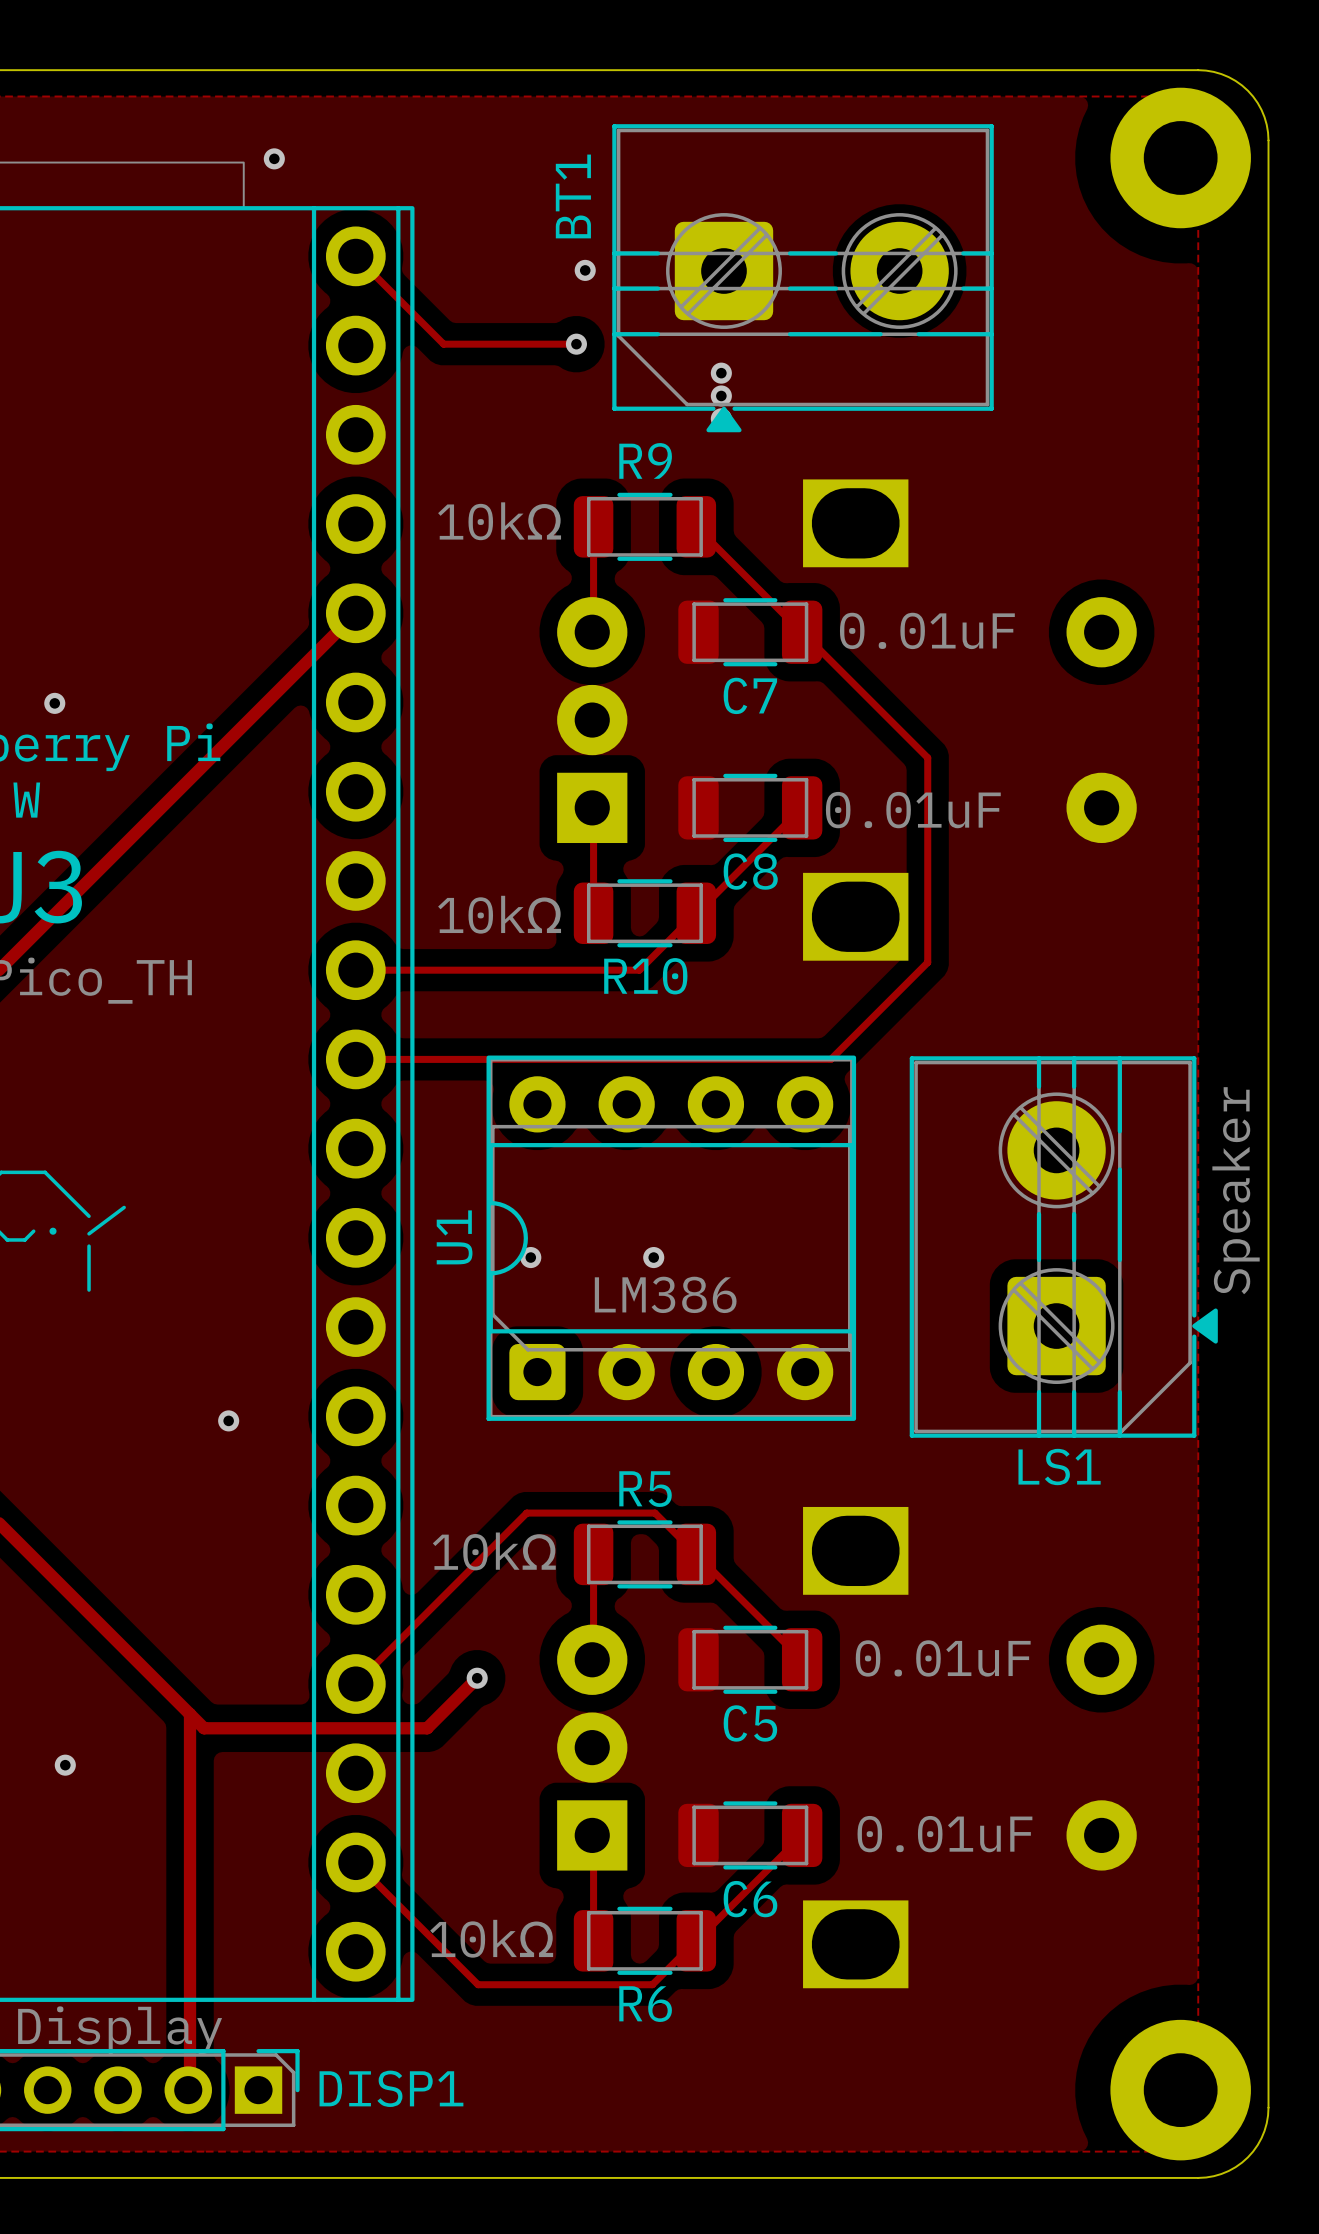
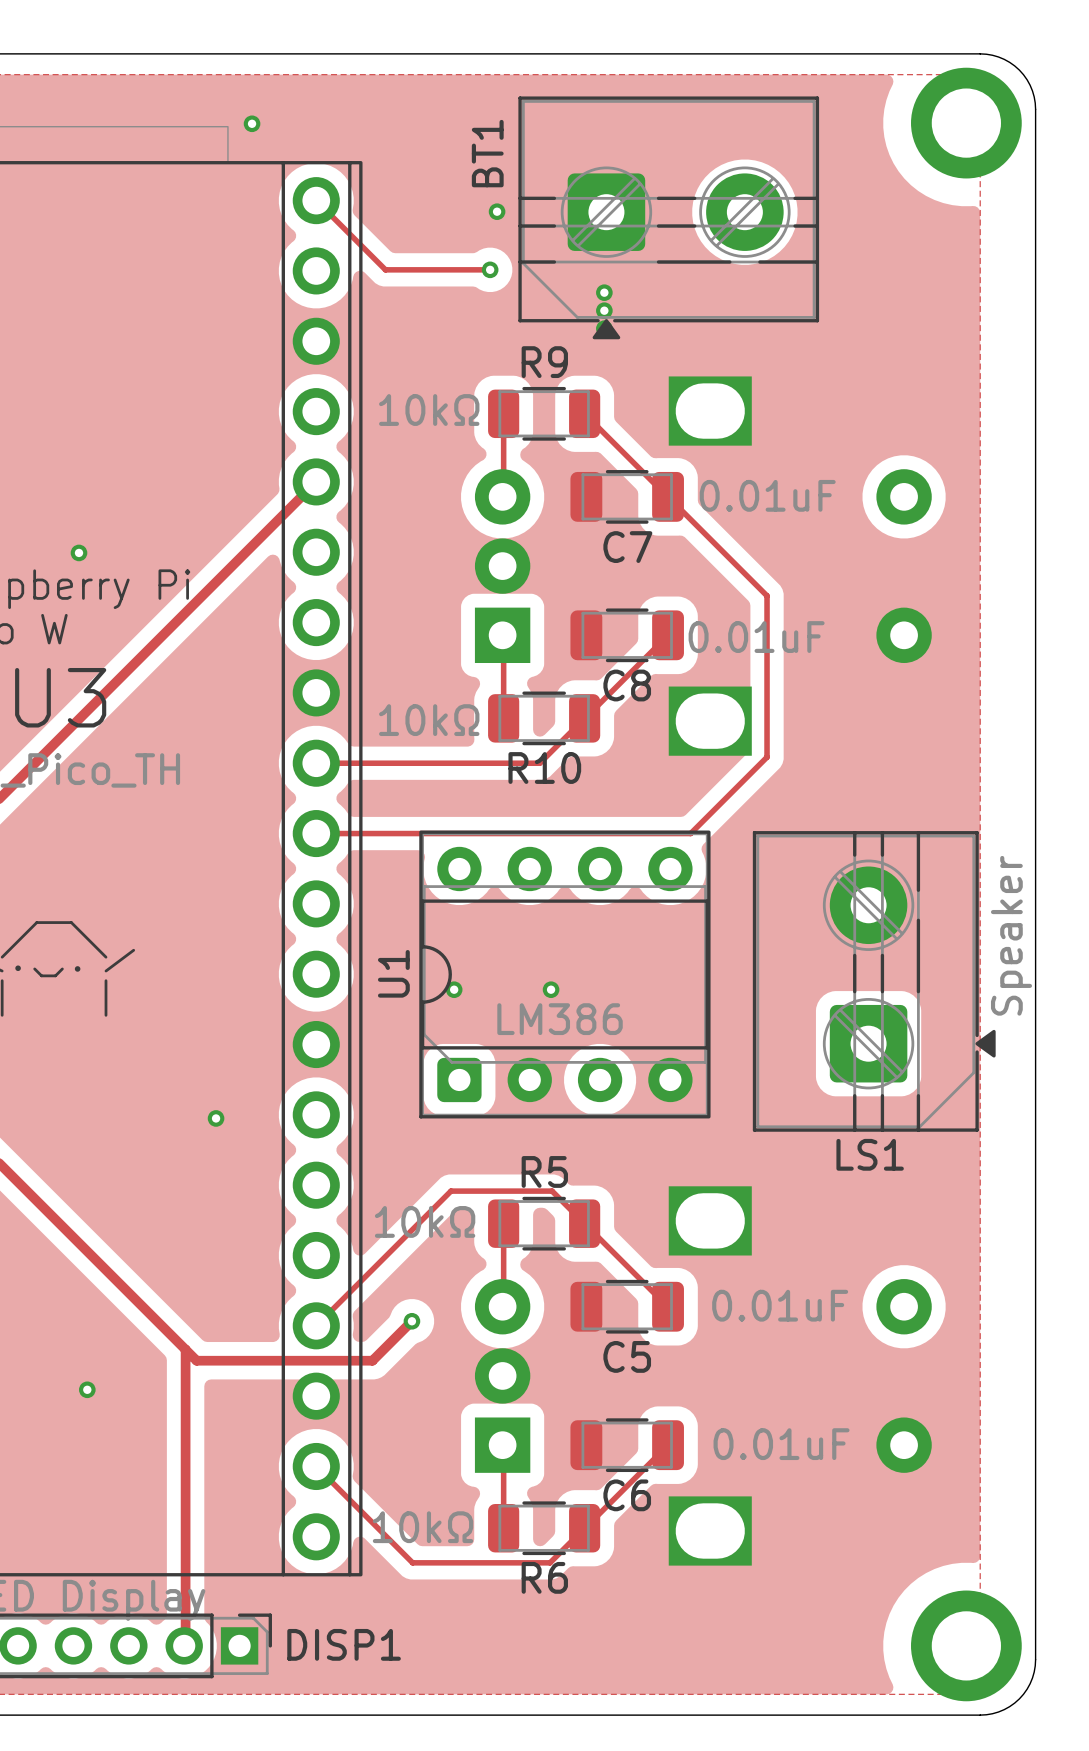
part footprint: [1110, 87, 1251, 229] -> [911, 67, 1022, 179]
part footprint: [1110, 2019, 1251, 2161] -> [911, 1590, 1022, 1702]

